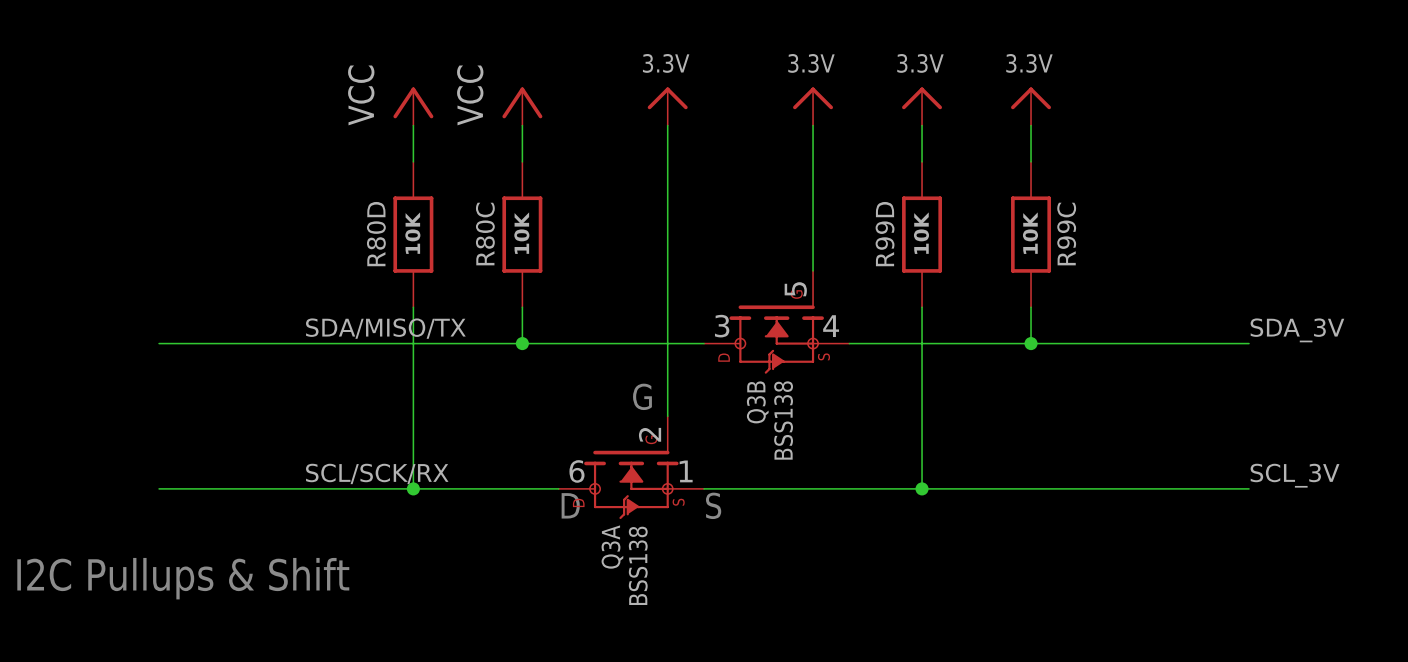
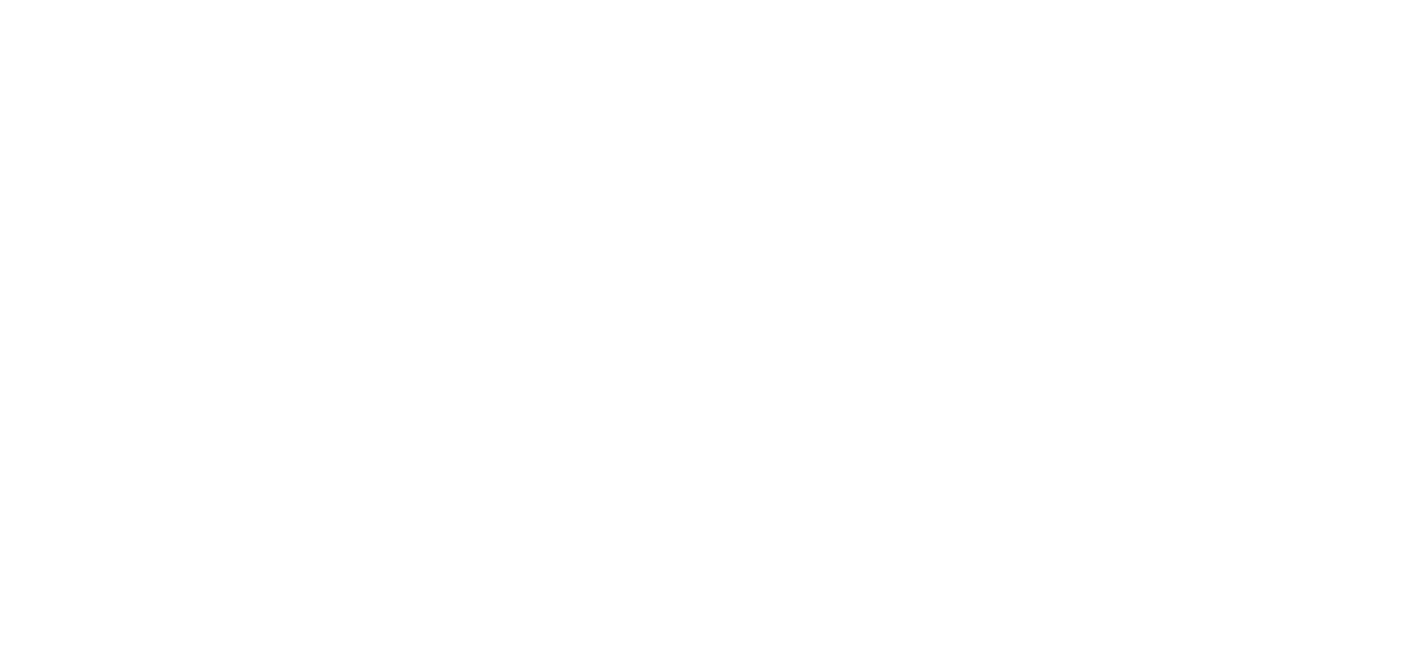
power symbol: VCC (413, 106) -> none
power symbol: VCC (522, 106) -> none
power symbol: 3.3V (667, 106) -> none
power symbol: 3.3V (813, 106) -> none
power symbol: 3.3V (922, 106) -> none
power symbol: 3.3V (1031, 106) -> none
wire: (413, 125) (413, 161) -> none
wire: (522, 125) (522, 161) -> none
wire: (667, 125) (667, 416) -> none
wire: (813, 125) (813, 270) -> none
wire: (922, 125) (922, 161) -> none
wire: (1031, 125) (1031, 161) -> none
R80D: 10K (413, 234) -> none
R80C: 10K (522, 234) -> none
R99D: 10K (922, 234) -> none
R99C: 10K (1031, 234) -> none
wire: (413, 307) (413, 488) -> none
wire: (522, 307) (522, 343) -> none
wire: (922, 307) (922, 488) -> none
wire: (1031, 307) (1031, 343) -> none
Q3B: BSS138 (776, 322) -> none
label: SDA/MISO/TX (385, 328) -> none
label: SDA_3V (1297, 330) -> none
wire: (159, 343) (704, 343) -> none
junction: (522, 343) -> none
wire: (849, 343) (1249, 343) -> none
junction: (1031, 343) -> none
text: G (642, 396) -> none
Q3A: BSS138 (631, 467) -> none
label: SCL/SCK/RX (377, 473) -> none
label: SCL_3V (1295, 475) -> none
wire: (159, 488) (558, 488) -> none
junction: (413, 488) -> none
wire: (704, 488) (1249, 488) -> none
junction: (922, 488) -> none
text: D (570, 505) -> none
text: S (713, 505) -> none
text: I2C Pullups & Shift (183, 578) -> none

